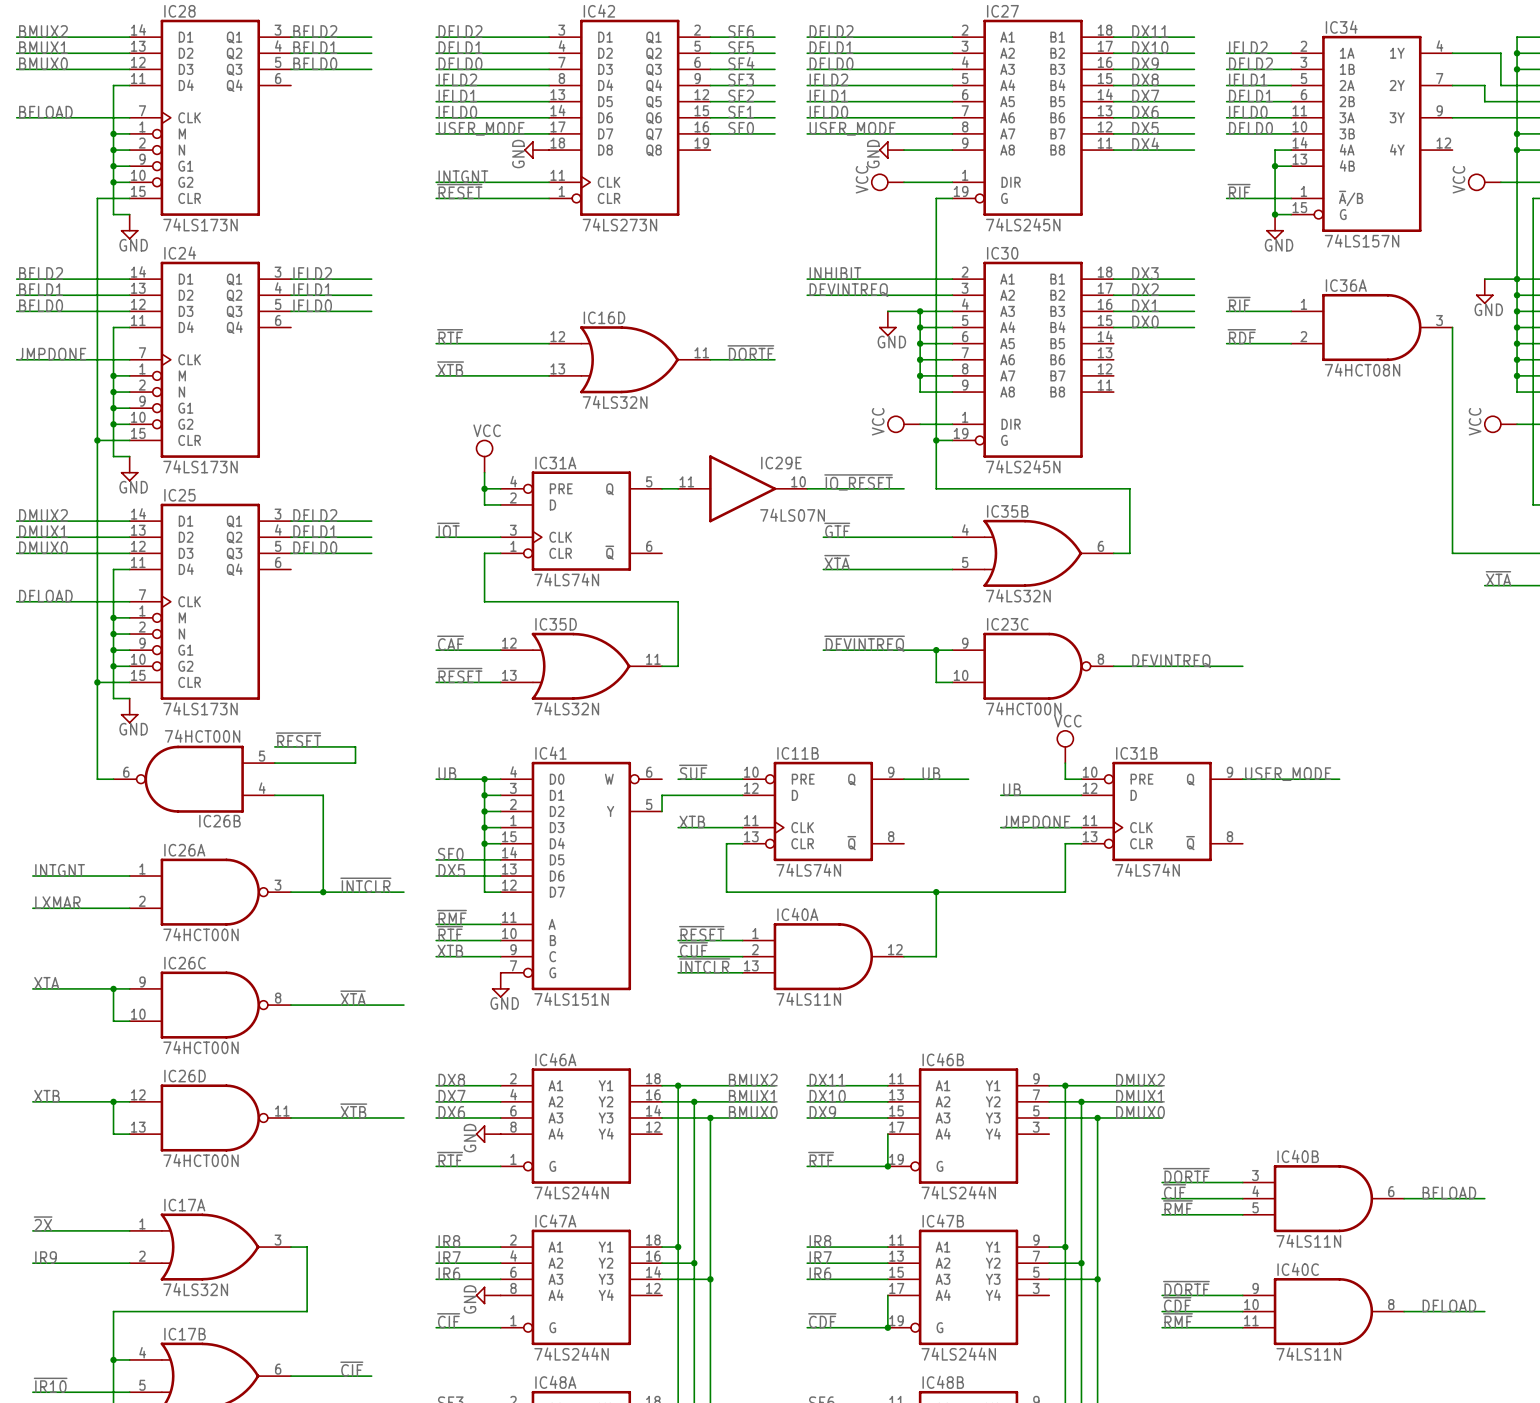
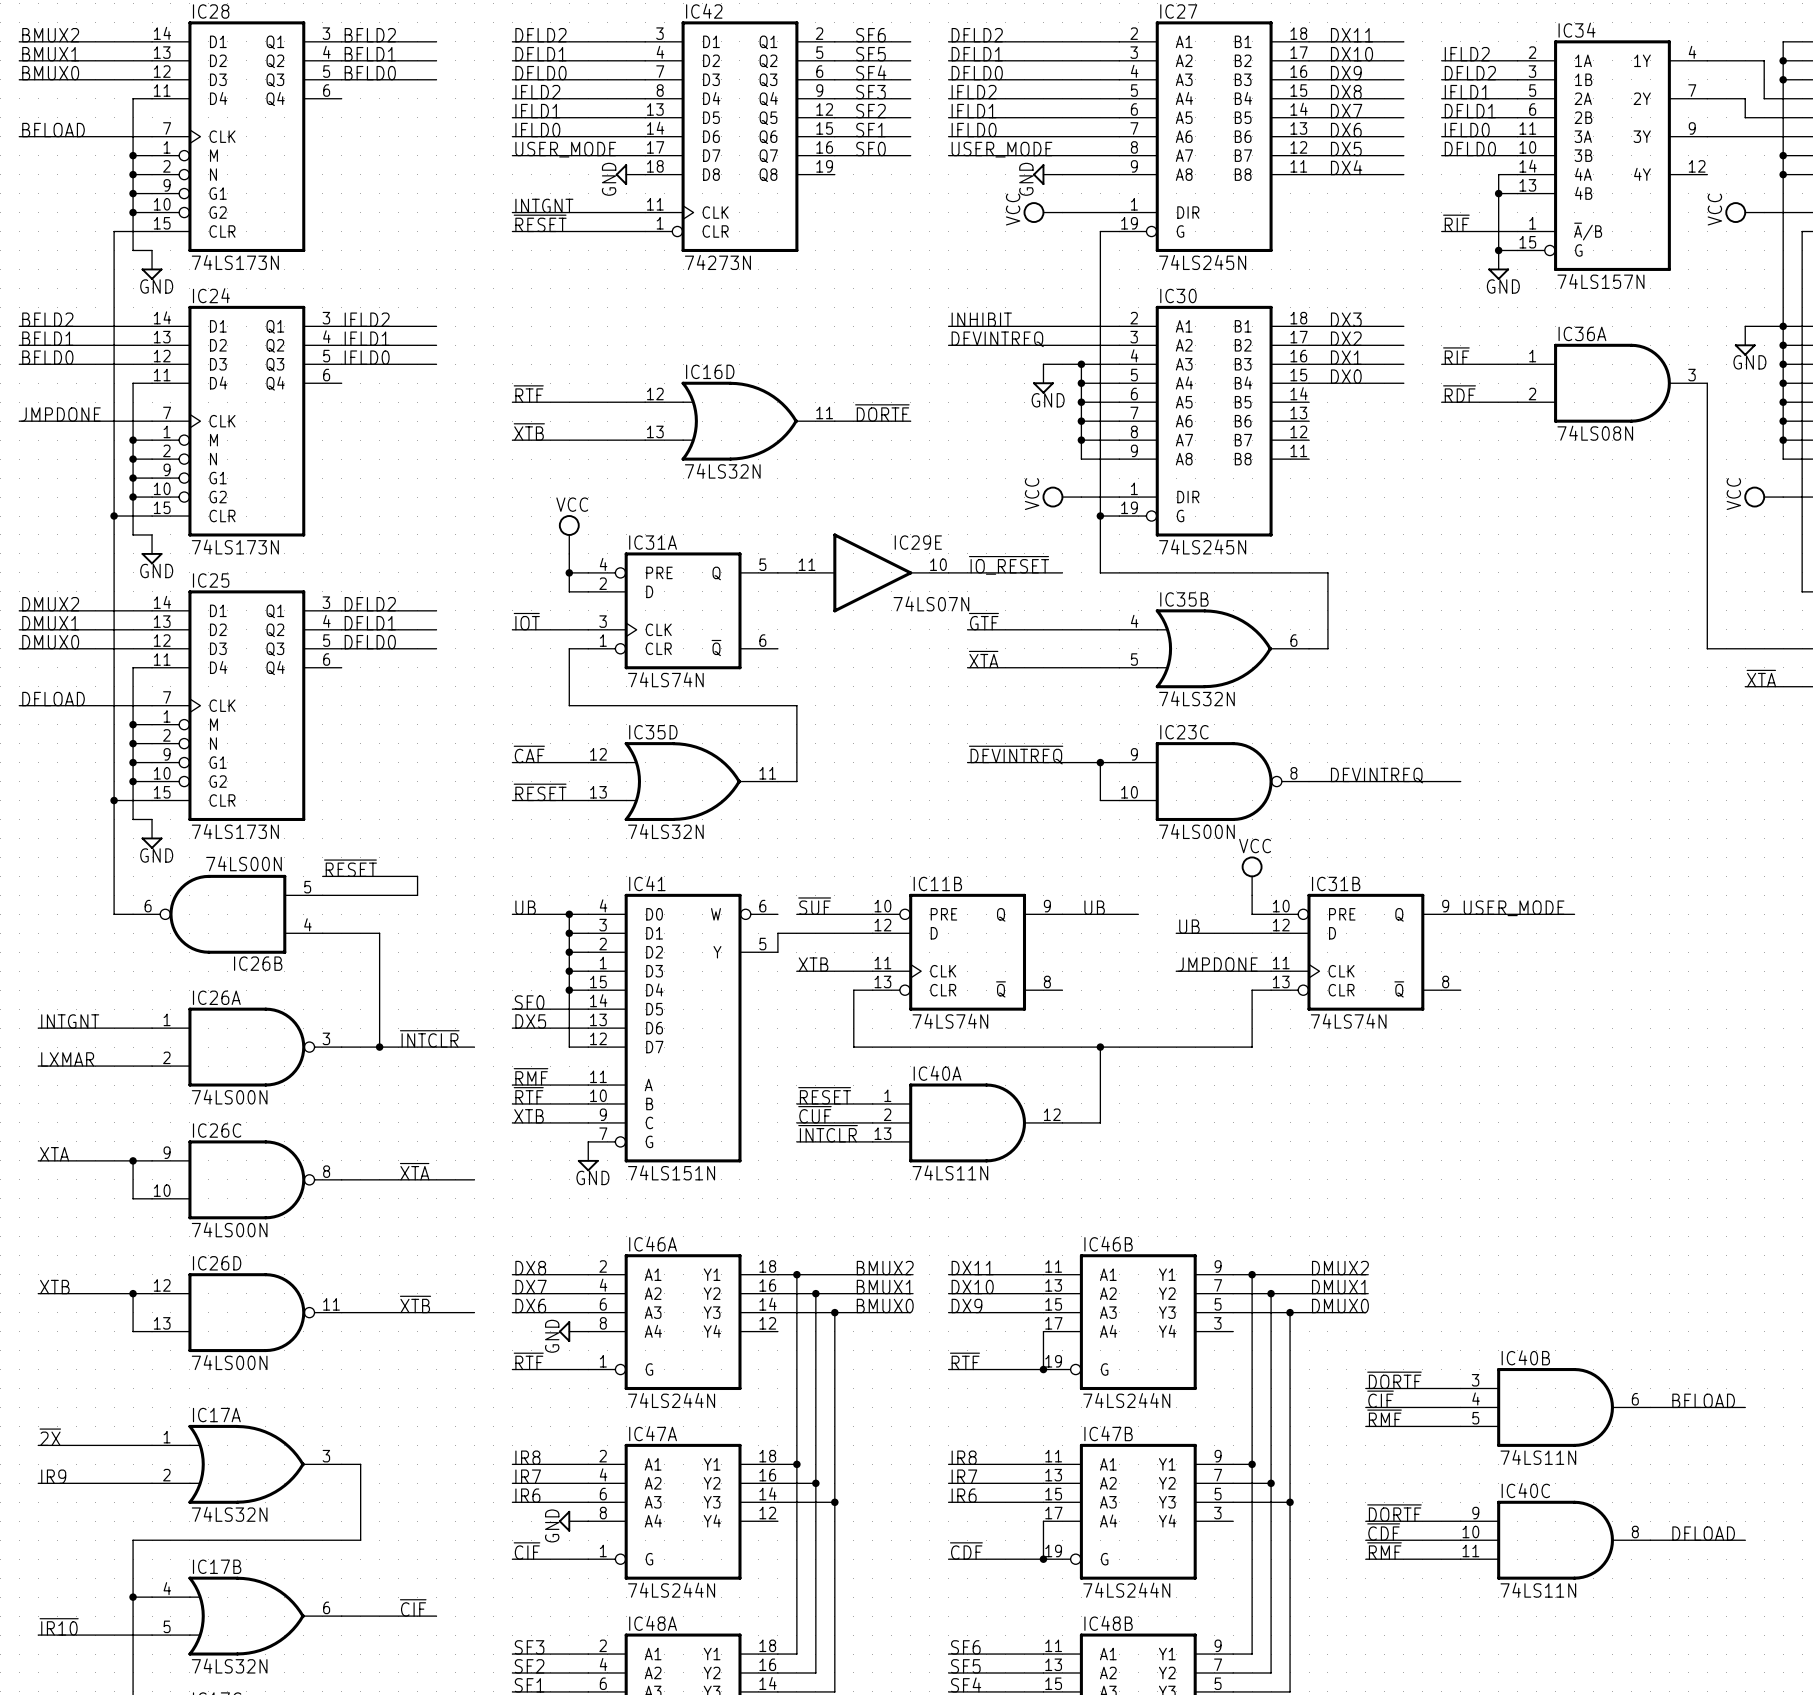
IC42 value: 74LS273N (619, 224) -> 74273N (717, 262)
IC36A value: 74HCT08N (1362, 369) -> 74LS08N (1595, 433)
IC23C value: 74HCT00N (1023, 708) -> 74LS00N (1196, 831)
IC26B value: 74HCT00N (202, 736) -> 74LS00N (243, 863)
IC26A value: 74HCT00N (200, 934) -> 74LS00N (229, 1097)
IC26C value: 74HCT00N (200, 1047) -> 74LS00N (229, 1229)
IC26D value: 74HCT00N (200, 1160) -> 74LS00N (229, 1362)

